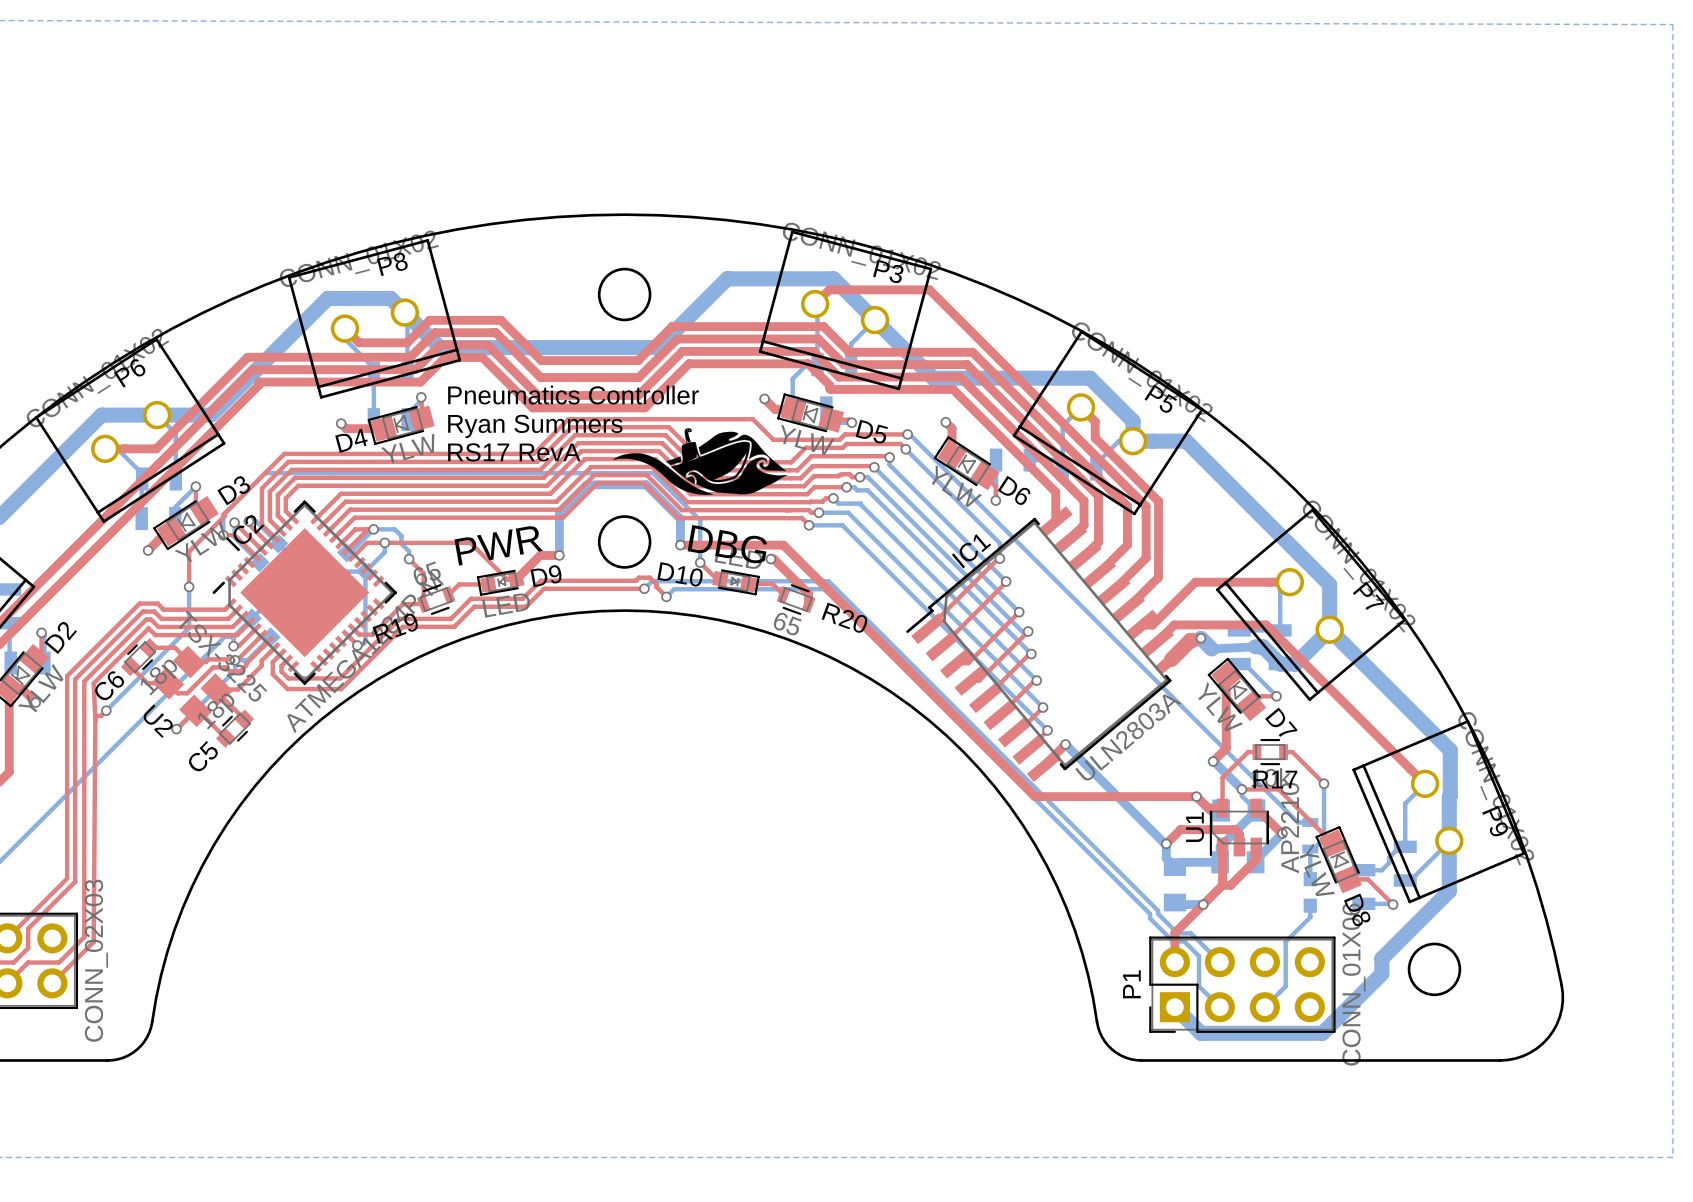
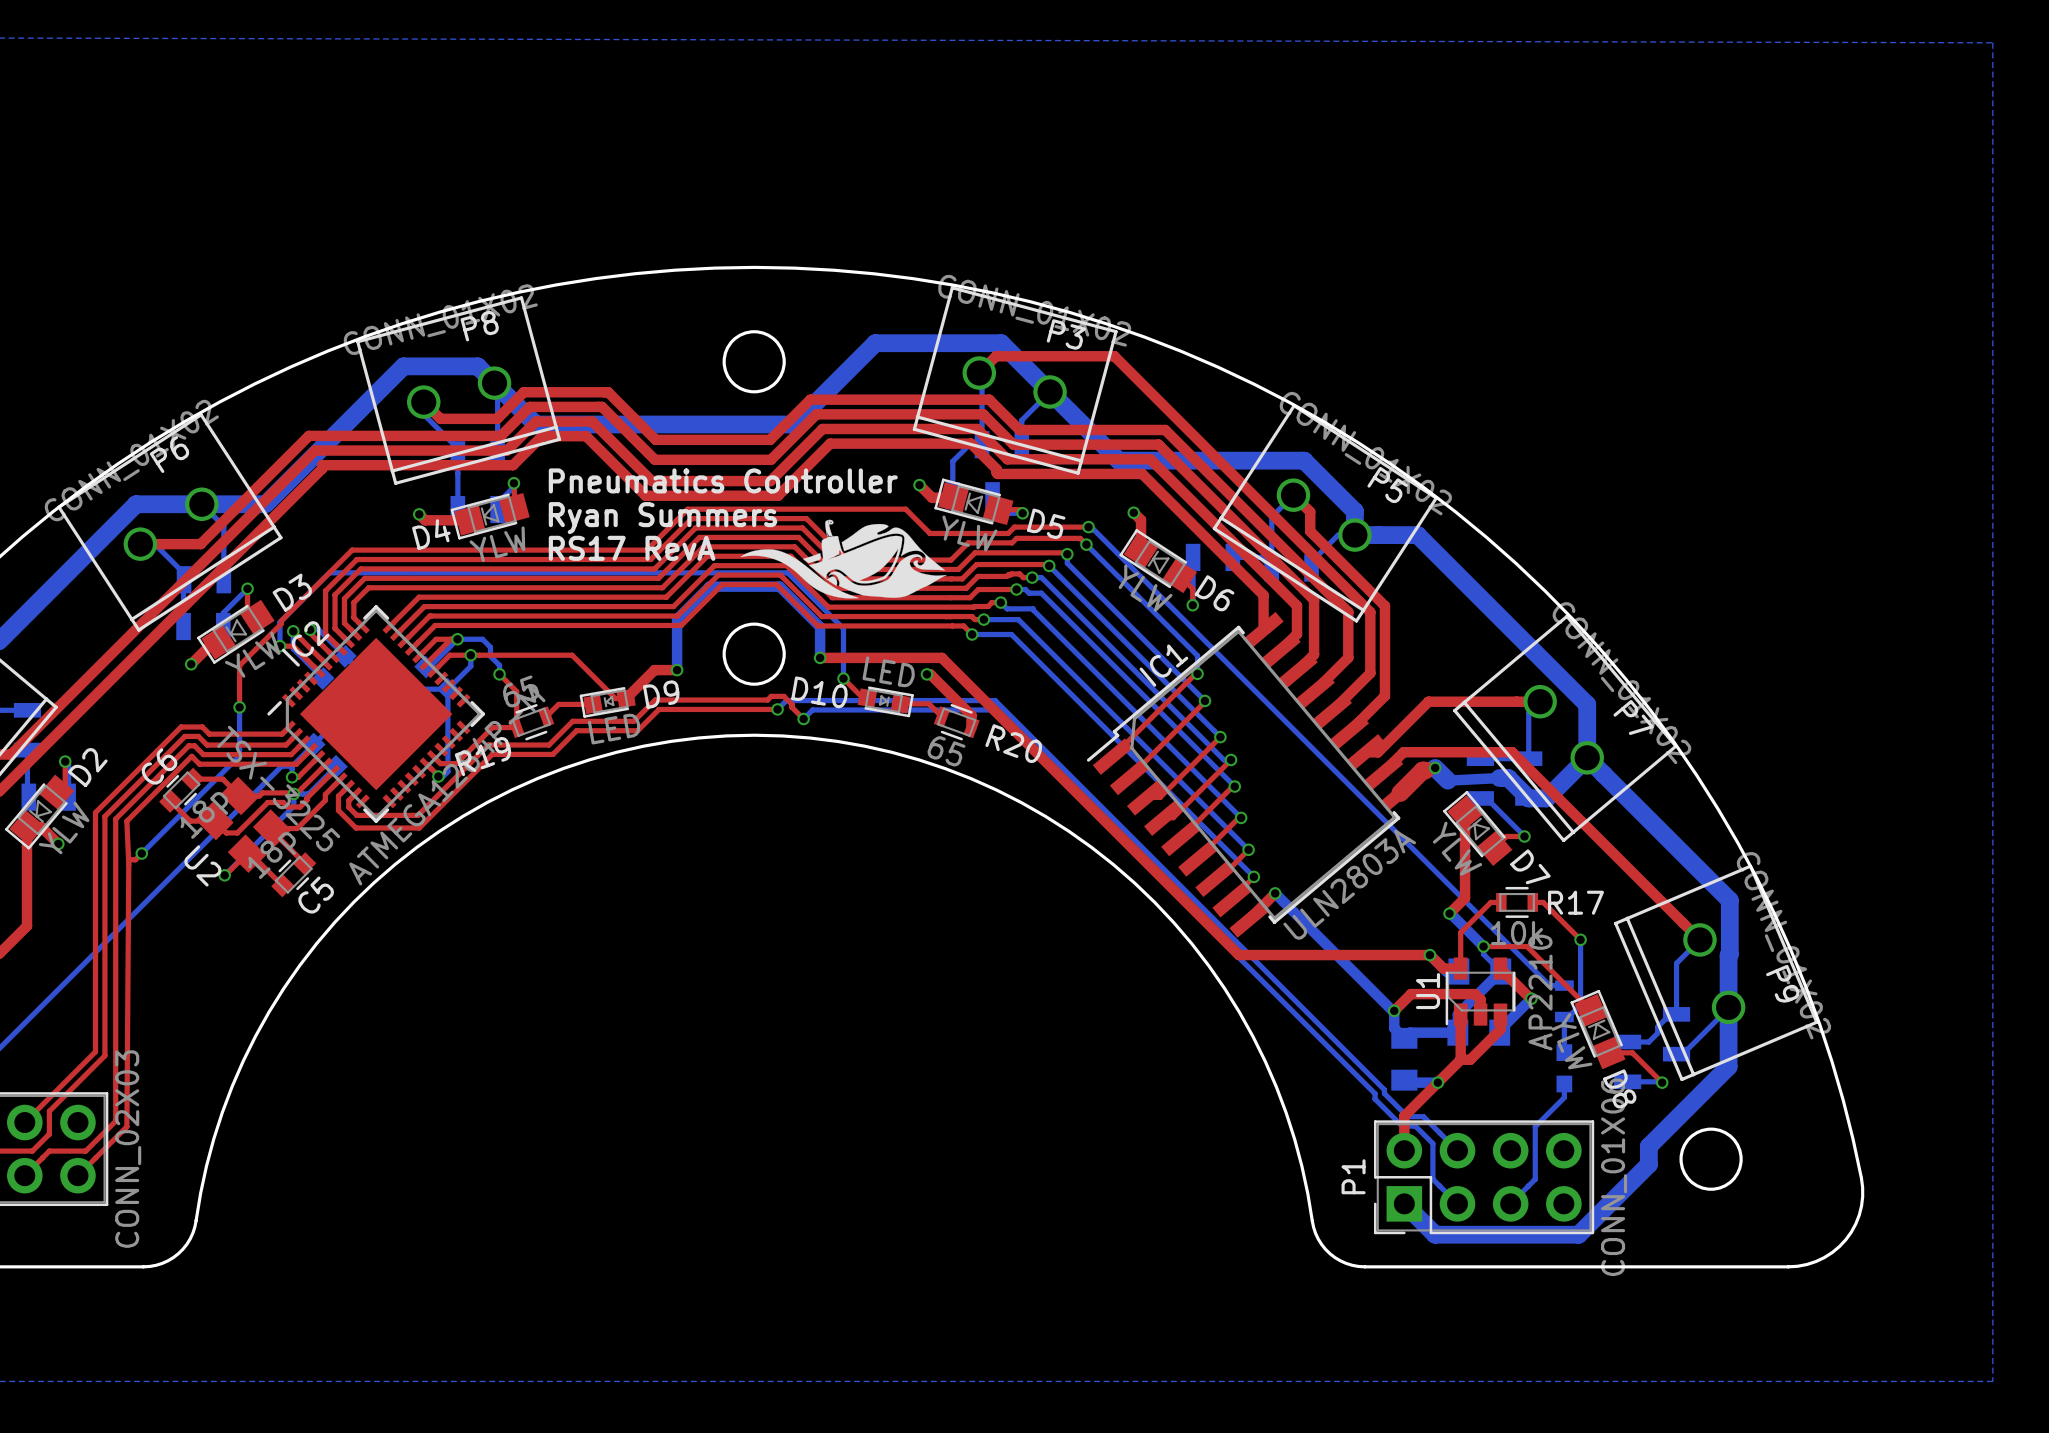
text: DBG (727, 544) -> none
text: PWR (498, 545) -> none
C6 name position: C6 (109, 685) -> C6 (159, 766)
C5 name position: C5 (203, 756) -> C5 (316, 895)
R17 name position: R17 (1275, 779) -> R17 (1576, 902)

